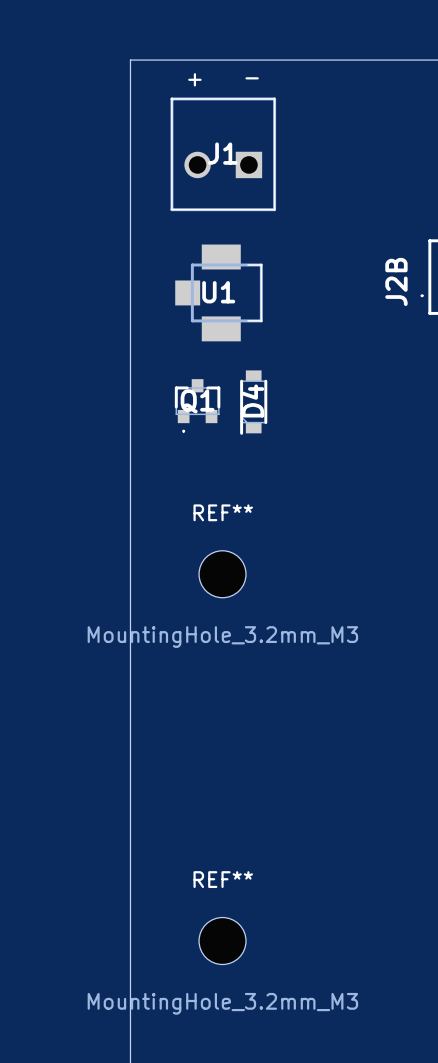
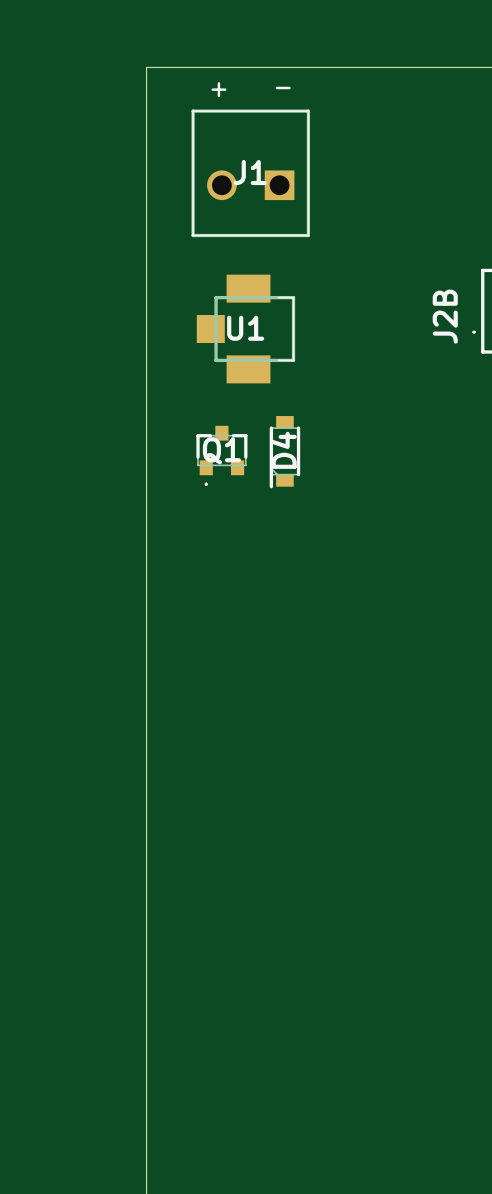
REF**: MountingHole_3.2mm_M3 (222, 574) -> none
REF**: MountingHole_3.2mm_M3 (222, 941) -> none

